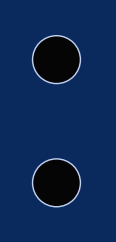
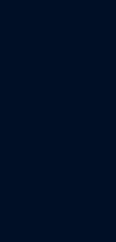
part: (56, 59) -> none
part: (56, 182) -> none

